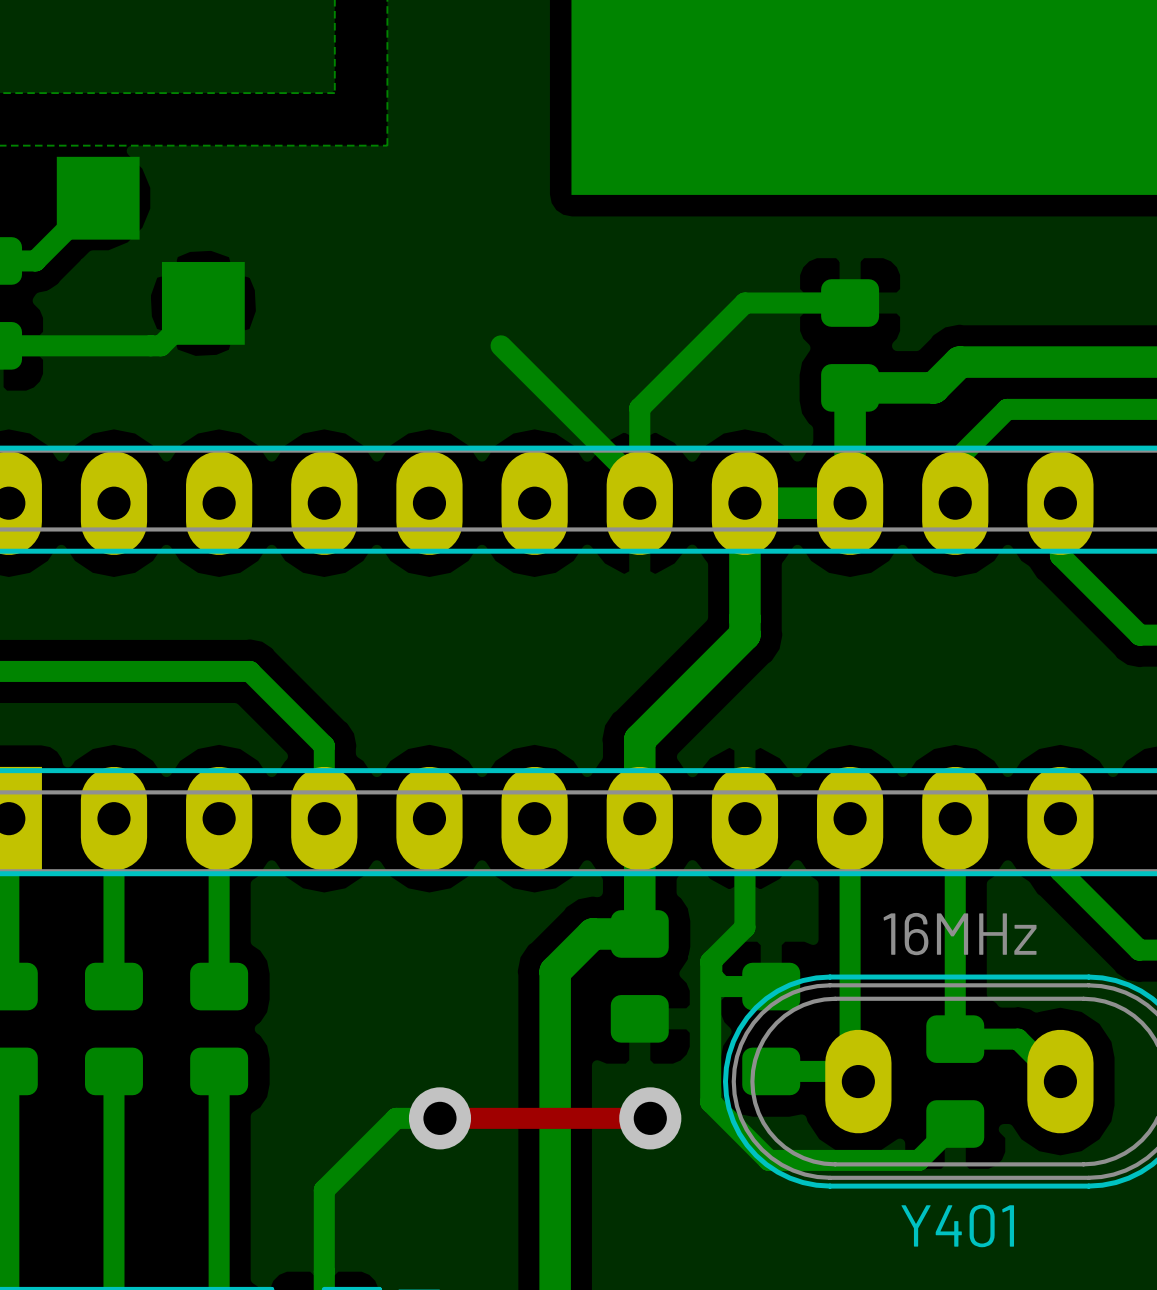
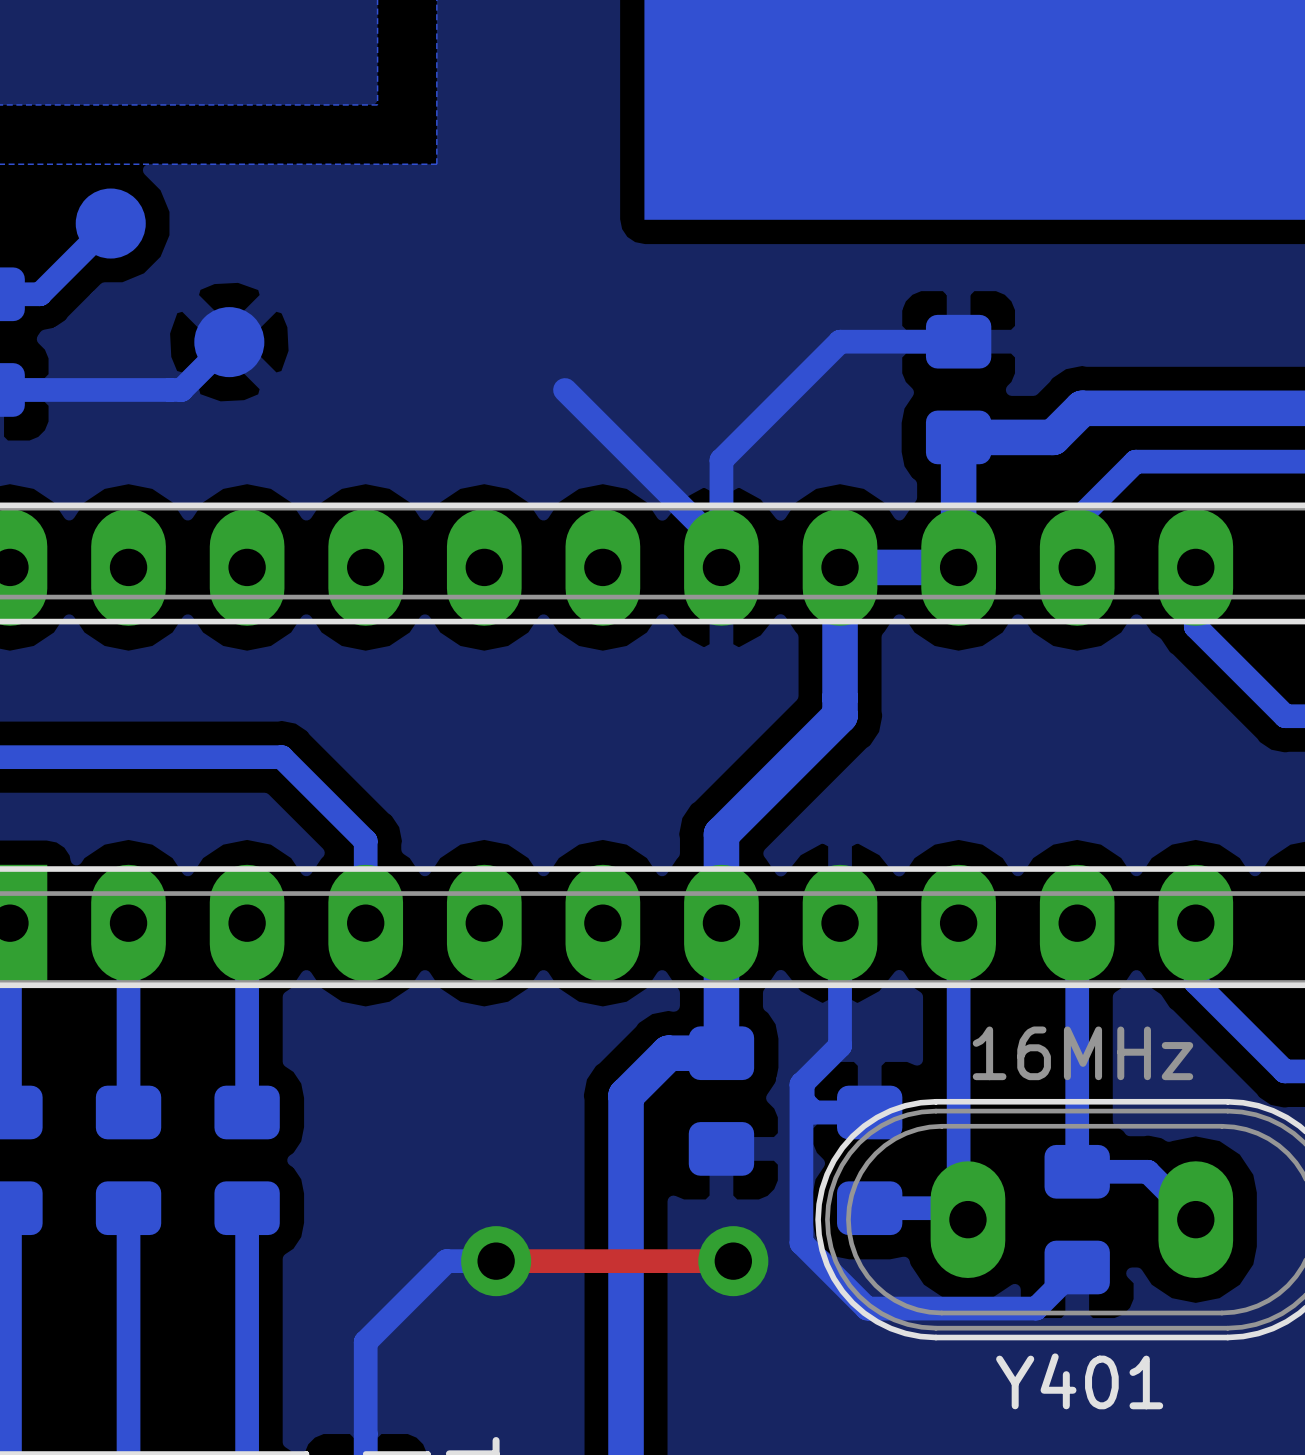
part footprint: [56, 156, 140, 240] -> [75, 188, 146, 259]
part footprint: [161, 261, 245, 345] -> [194, 307, 265, 378]

